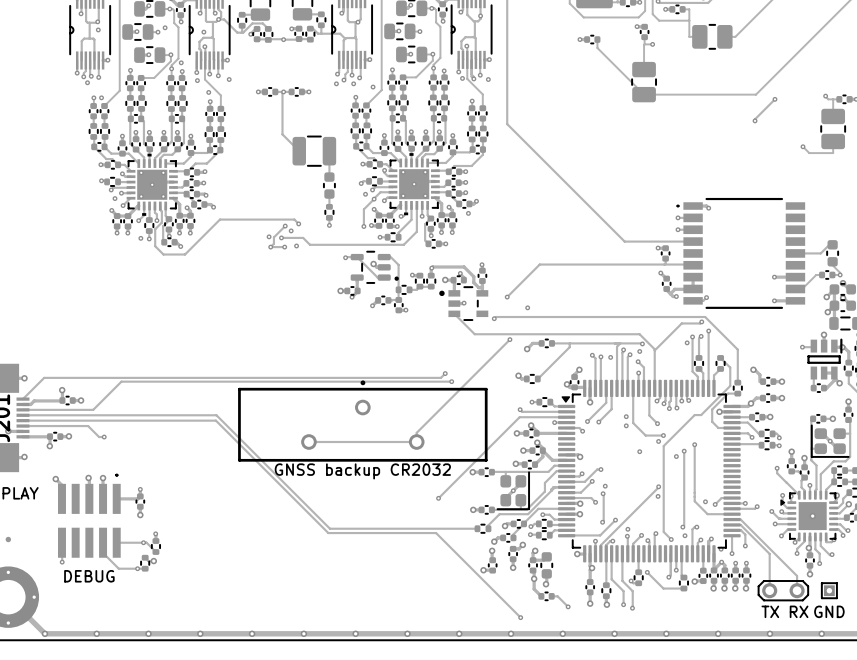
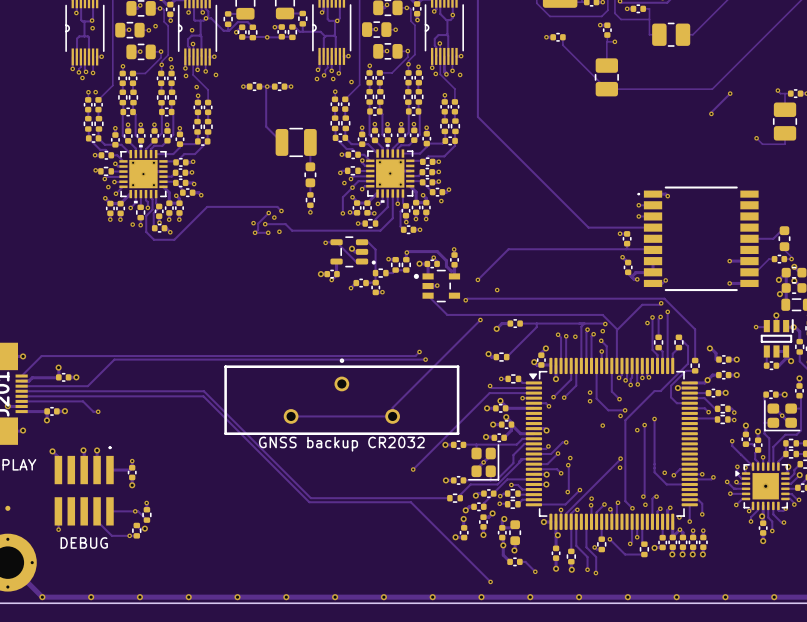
track: (732, 519) (740, 519) (797, 575) (797, 590) -> none
track: (732, 524) (740, 524) (769, 554) (769, 590) -> none
part: (783, 590) -> none
part: (829, 590) -> none

